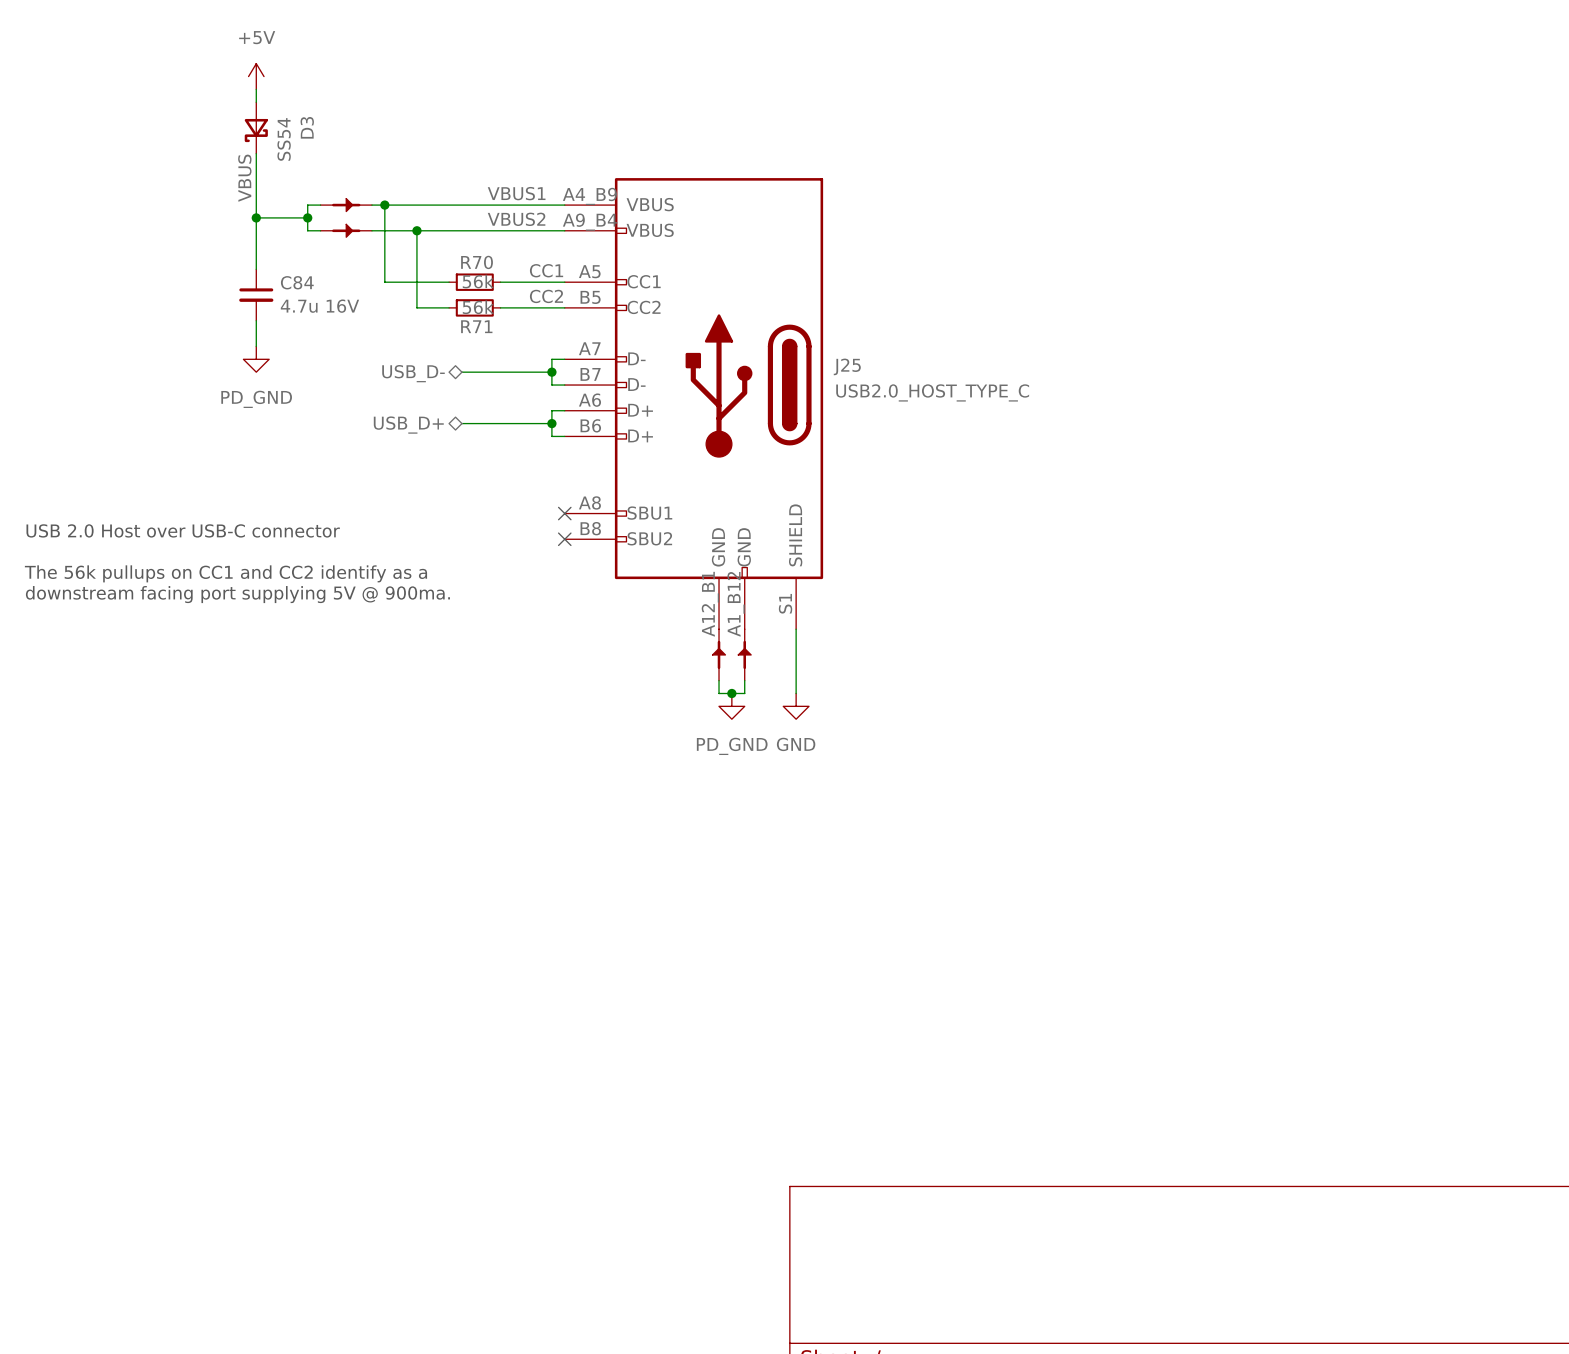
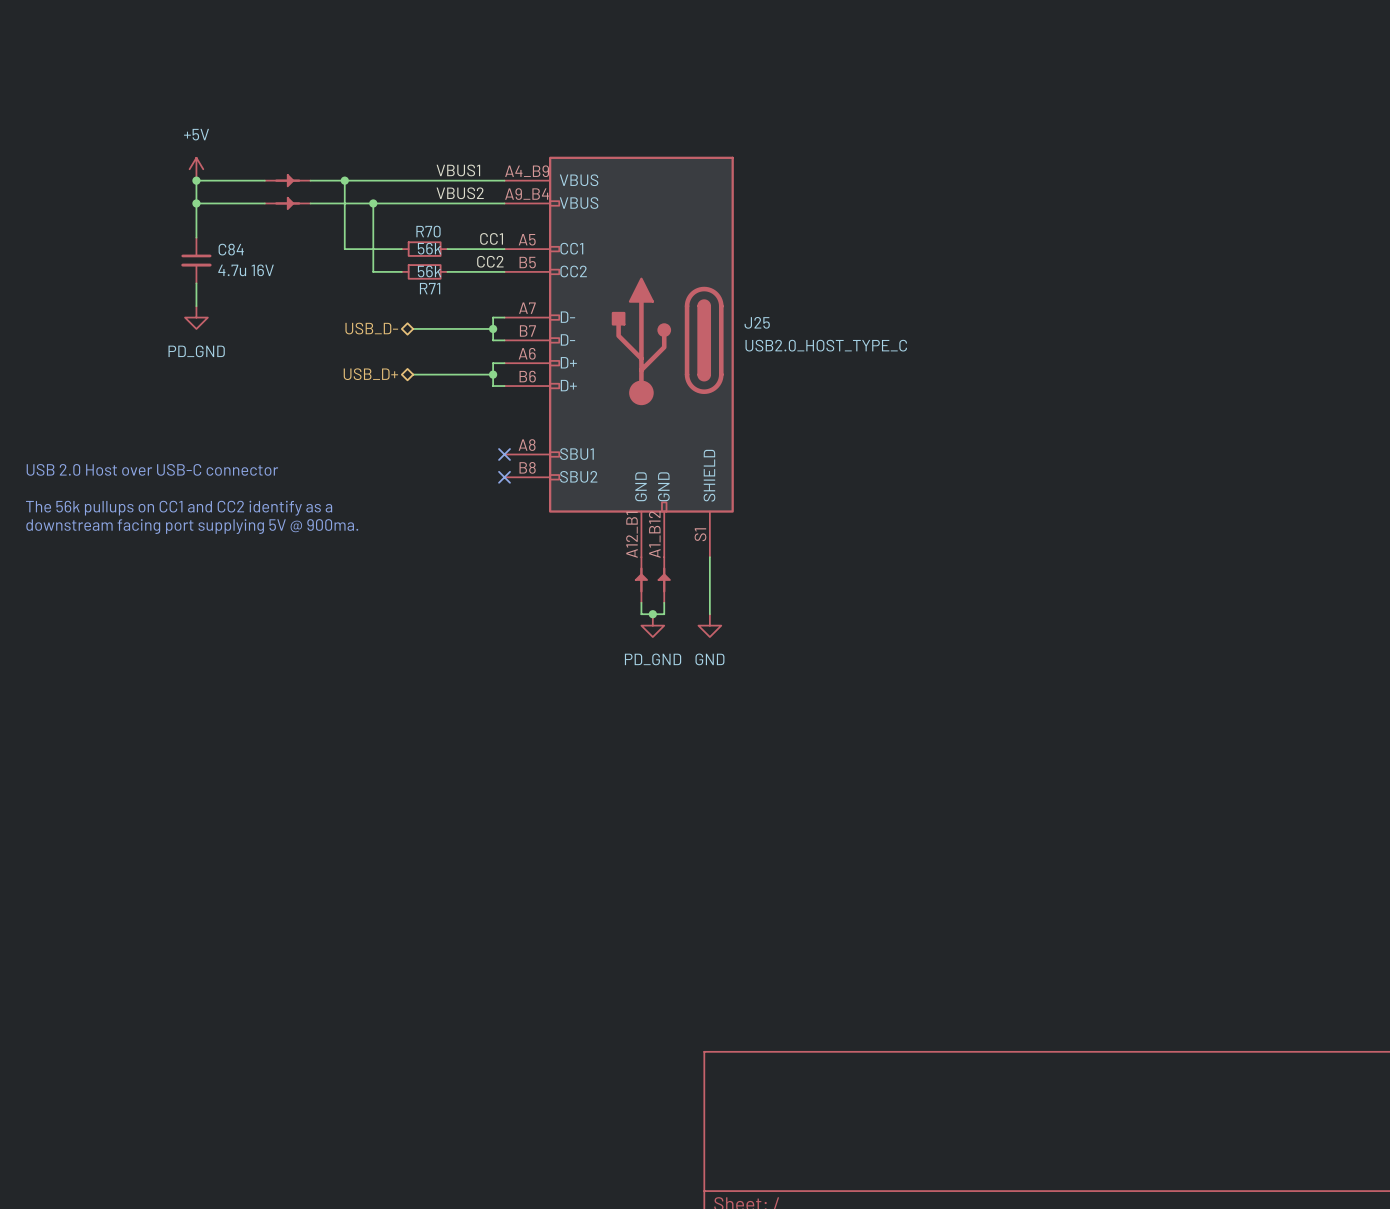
power symbol position: +5V (256, 76) -> +5V (196, 169)
wire: (256, 89) (256, 102) -> none
D3: SS54 (256, 127) -> none
wire: (256, 153) (256, 269) -> none
label: VBUS (244, 178) -> none
junction: none -> (196, 180)
wire: none -> (264, 180) (196, 180) (196, 237)
wire: (320, 205) (307, 205) (307, 230) (320, 230) -> none
part: none -> (287, 180)
part: (346, 205) -> none
wire: (256, 217) (307, 217) -> none
junction: (256, 217) -> none
junction: (307, 217) -> none
wire: none -> (196, 203) (264, 203)
junction: none -> (196, 203)
part: none -> (287, 203)
part: (346, 230) -> none
C84 position: (256, 295) -> (196, 260)
wire: (256, 320) (256, 346) -> (196, 283) (196, 306)
power symbol position: PD_GND (256, 359) -> PD_GND (196, 317)

